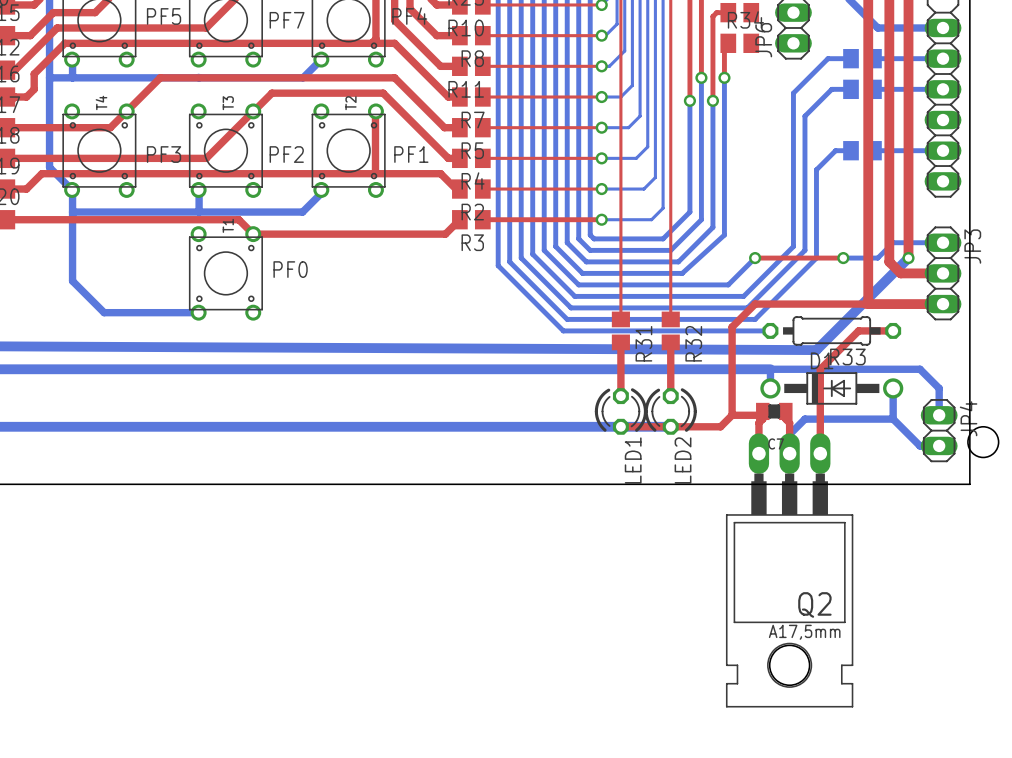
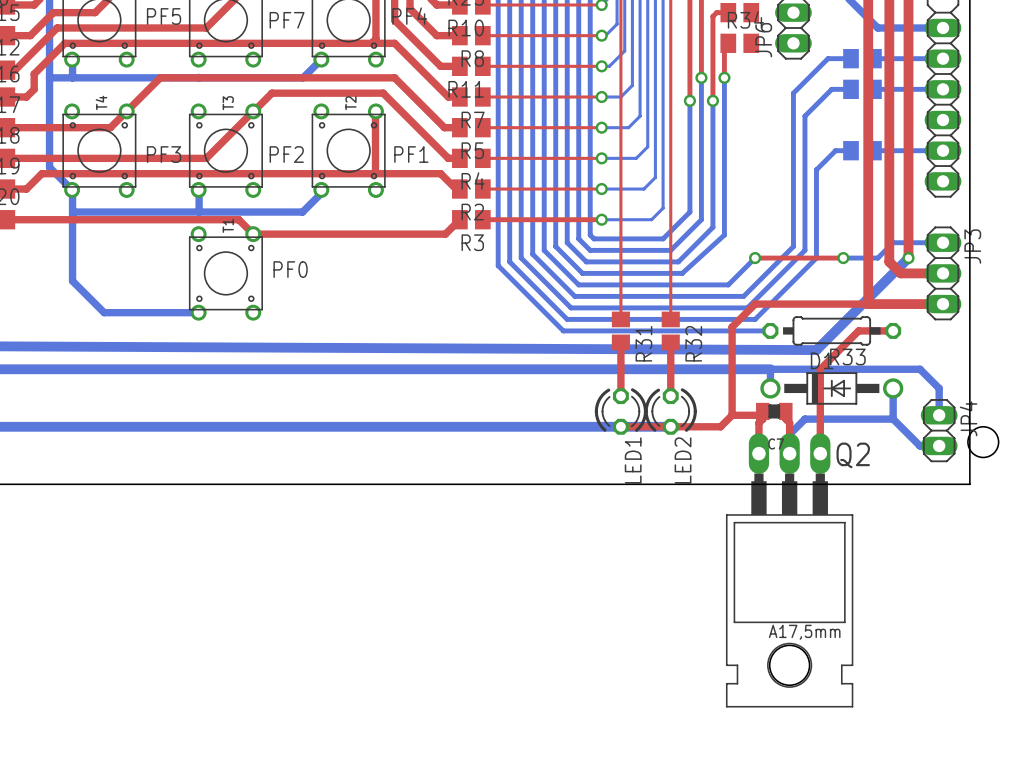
Q2 name position: Q2 (814, 604) -> Q2 (853, 455)

